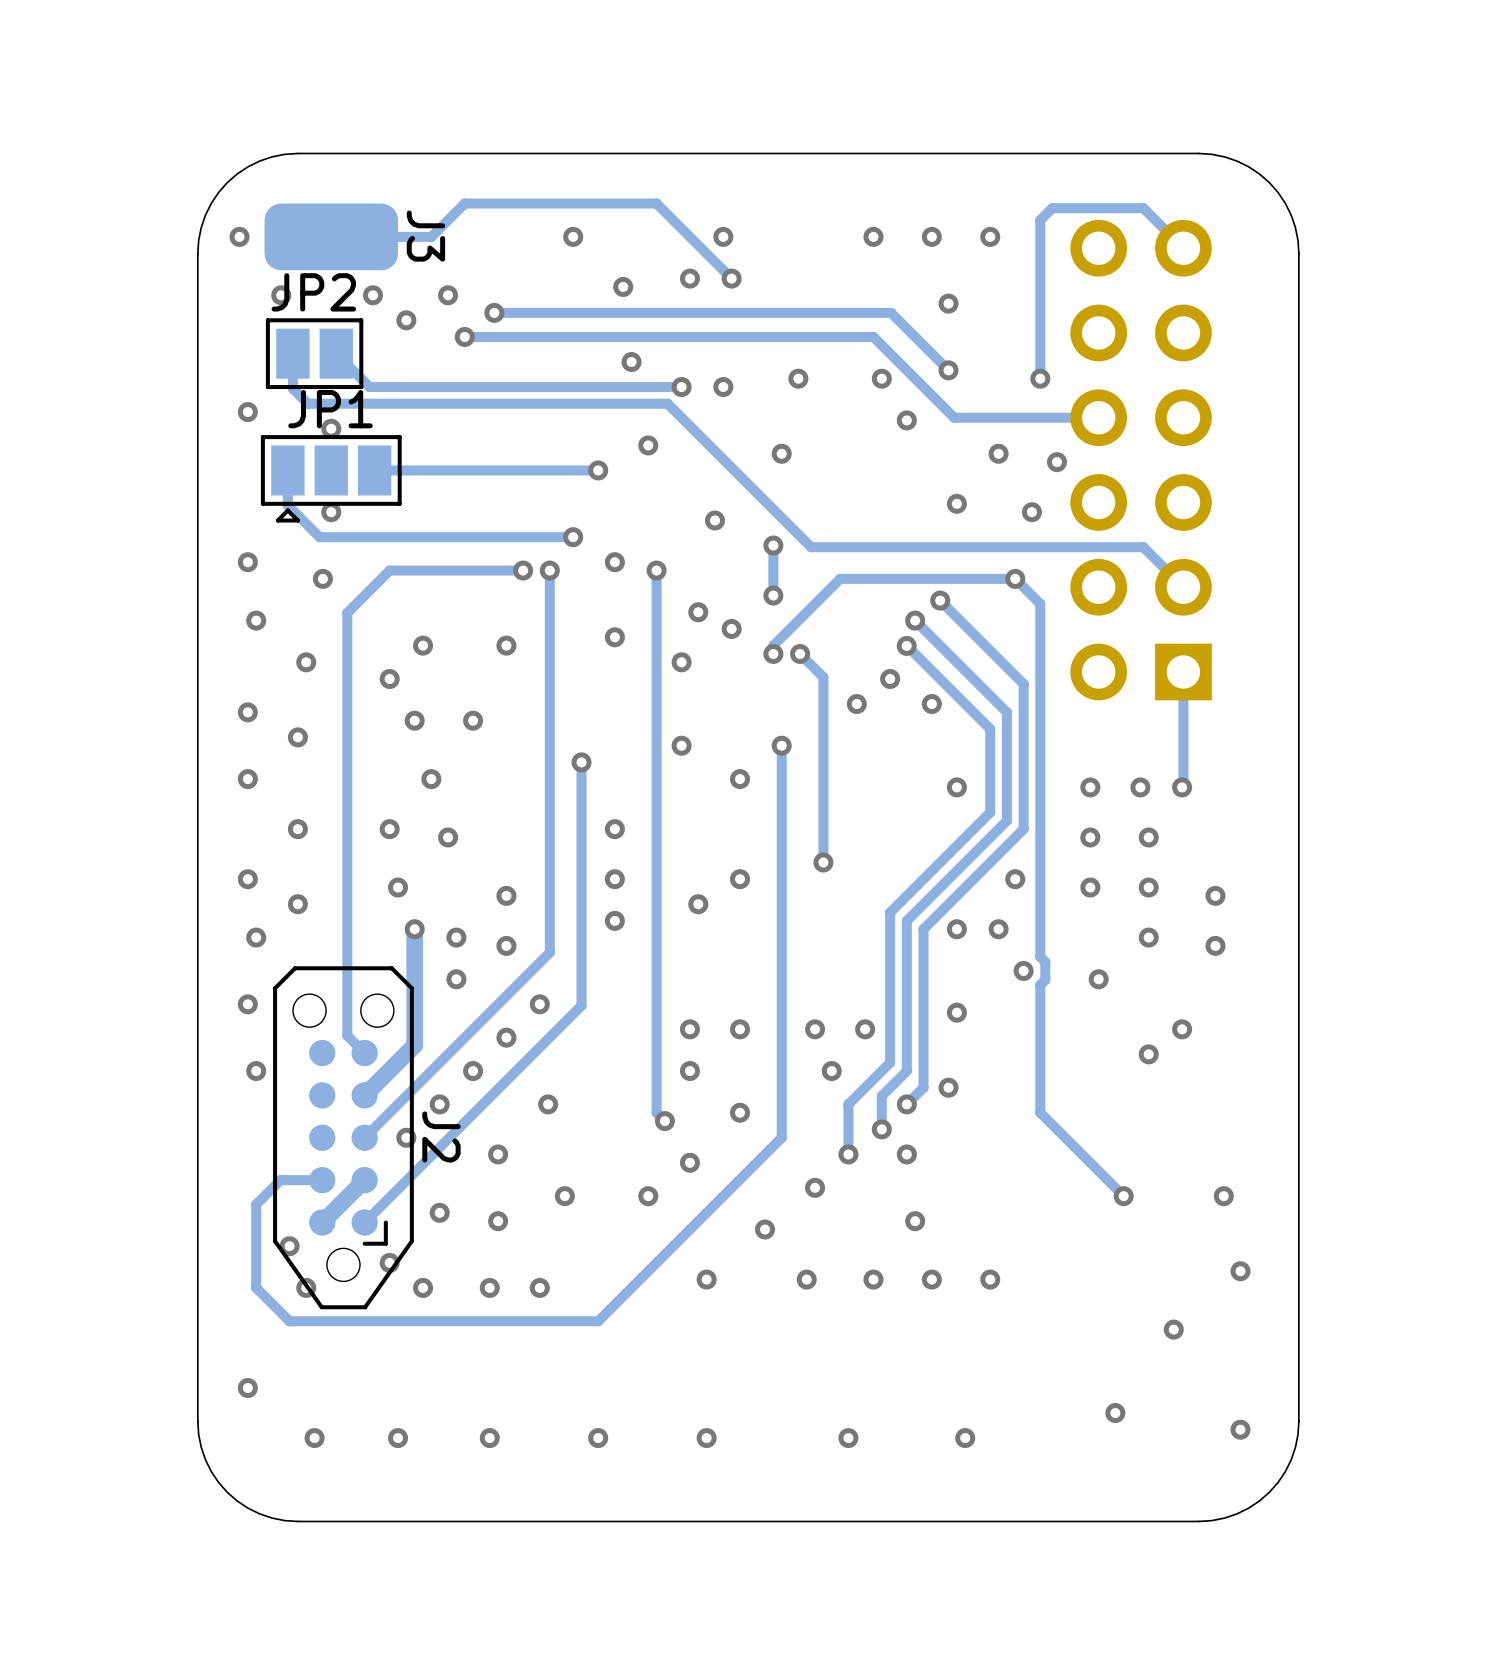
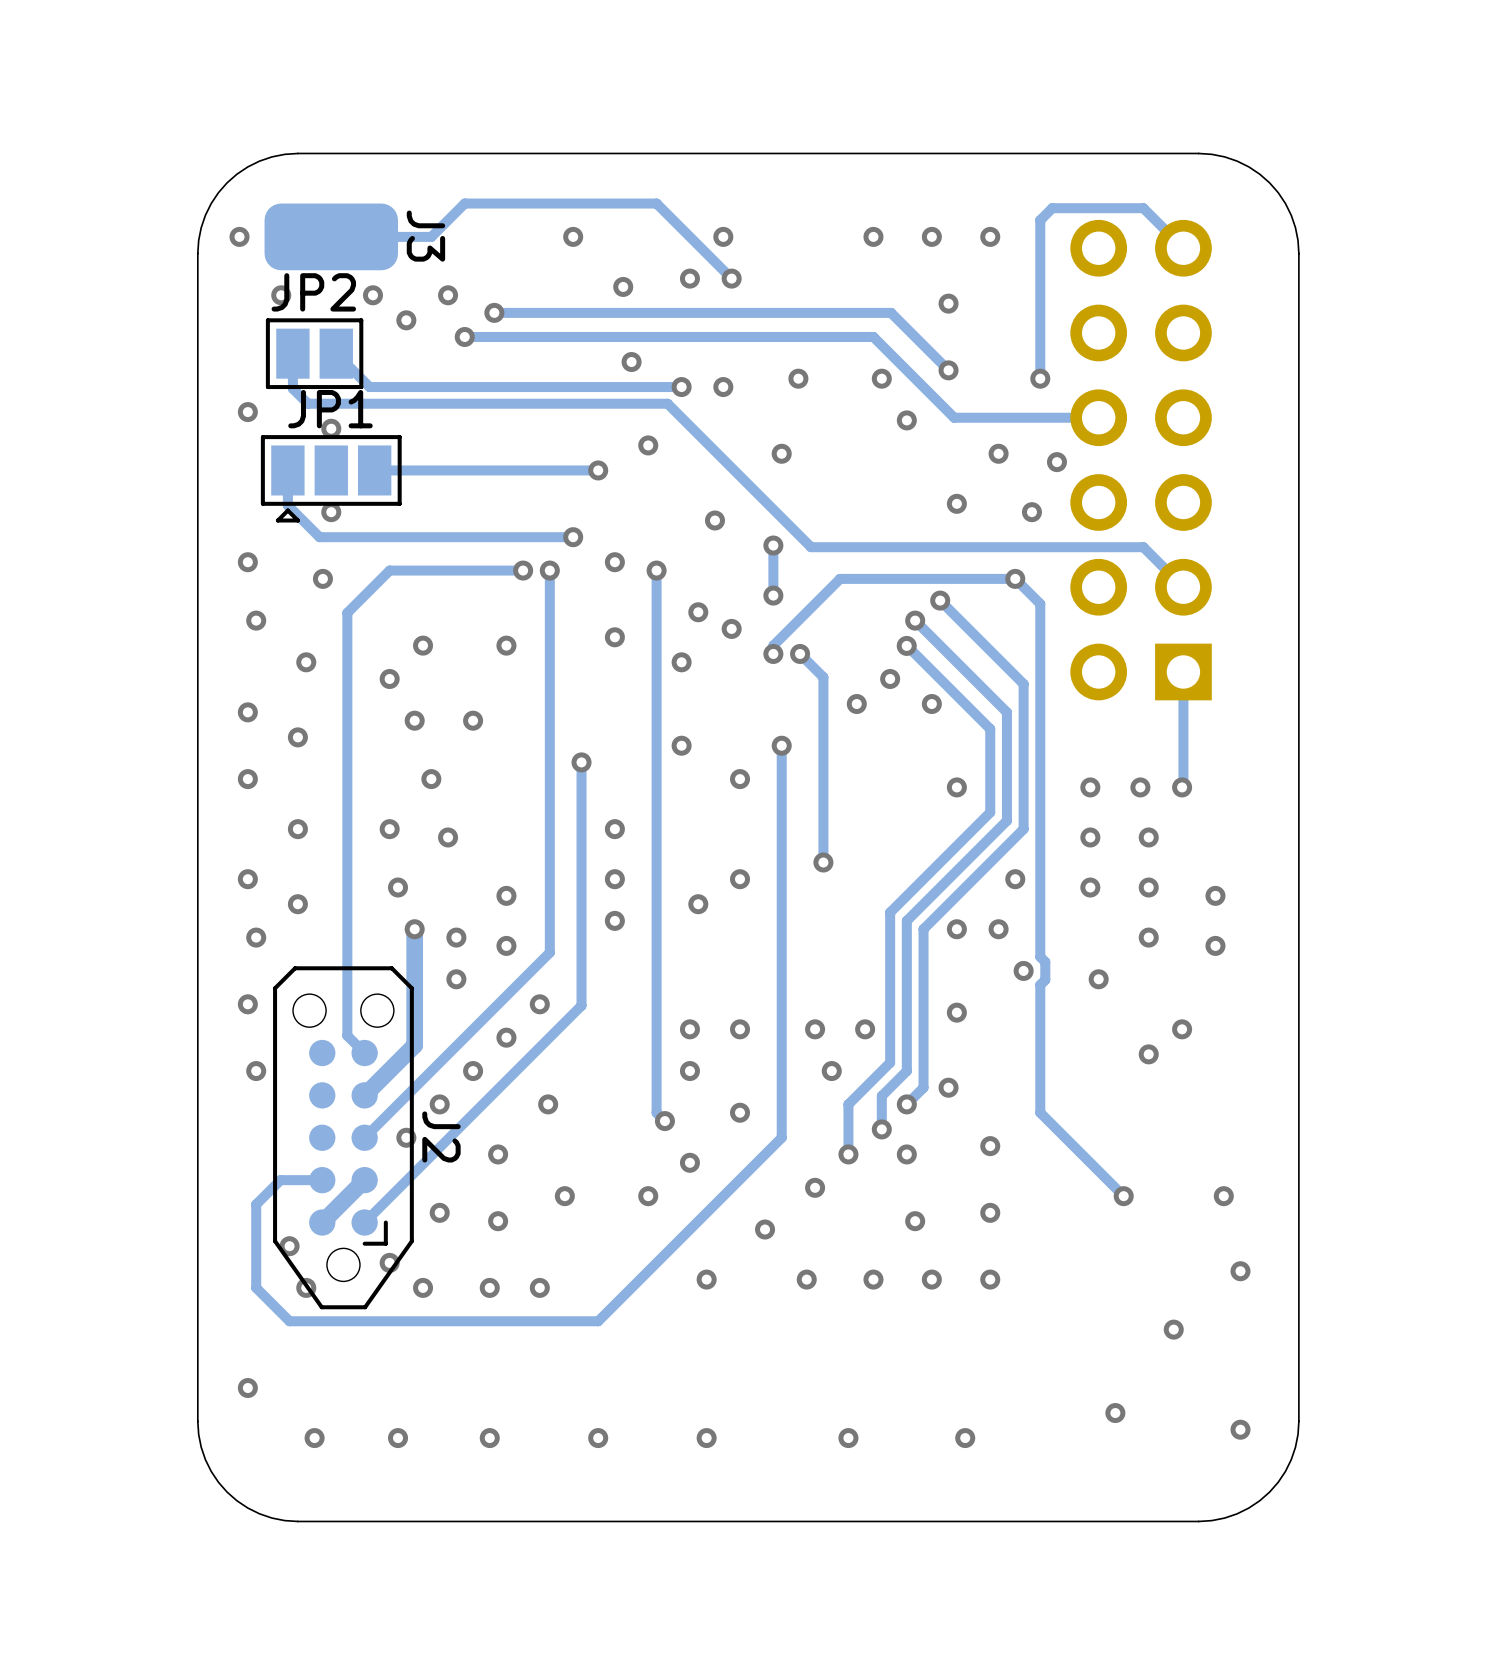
via: none -> (990, 1146)
via: none -> (990, 1212)

